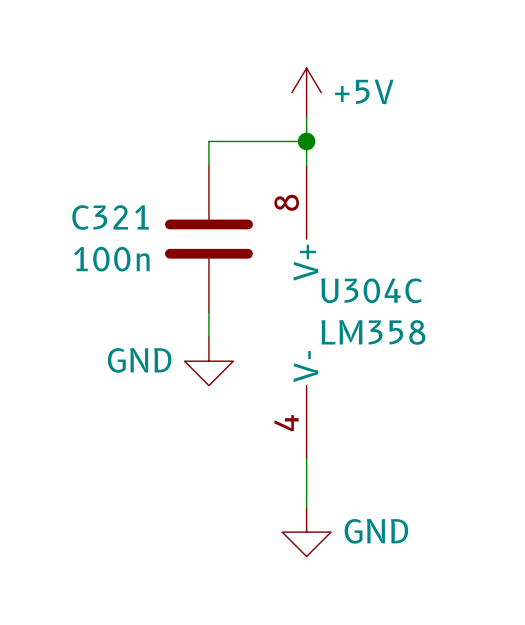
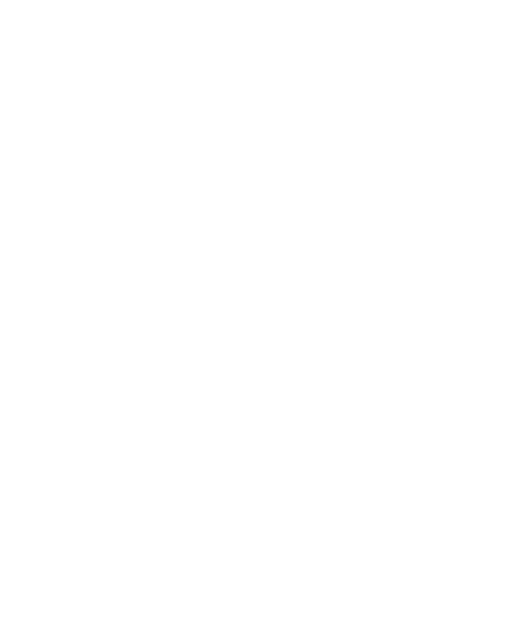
power symbol: +5V (306, 92) -> none
wire: (306, 117) (306, 165) -> none
wire: (306, 141) (208, 141) (208, 165) -> none
junction: (306, 141) -> none
C321: 100n (208, 239) -> none
wire: (208, 312) (208, 336) -> none
U304C: LM358 (306, 312) -> none
power symbol: GND (208, 361) -> none
wire: (306, 458) (306, 507) -> none
power symbol: GND (306, 532) -> none

